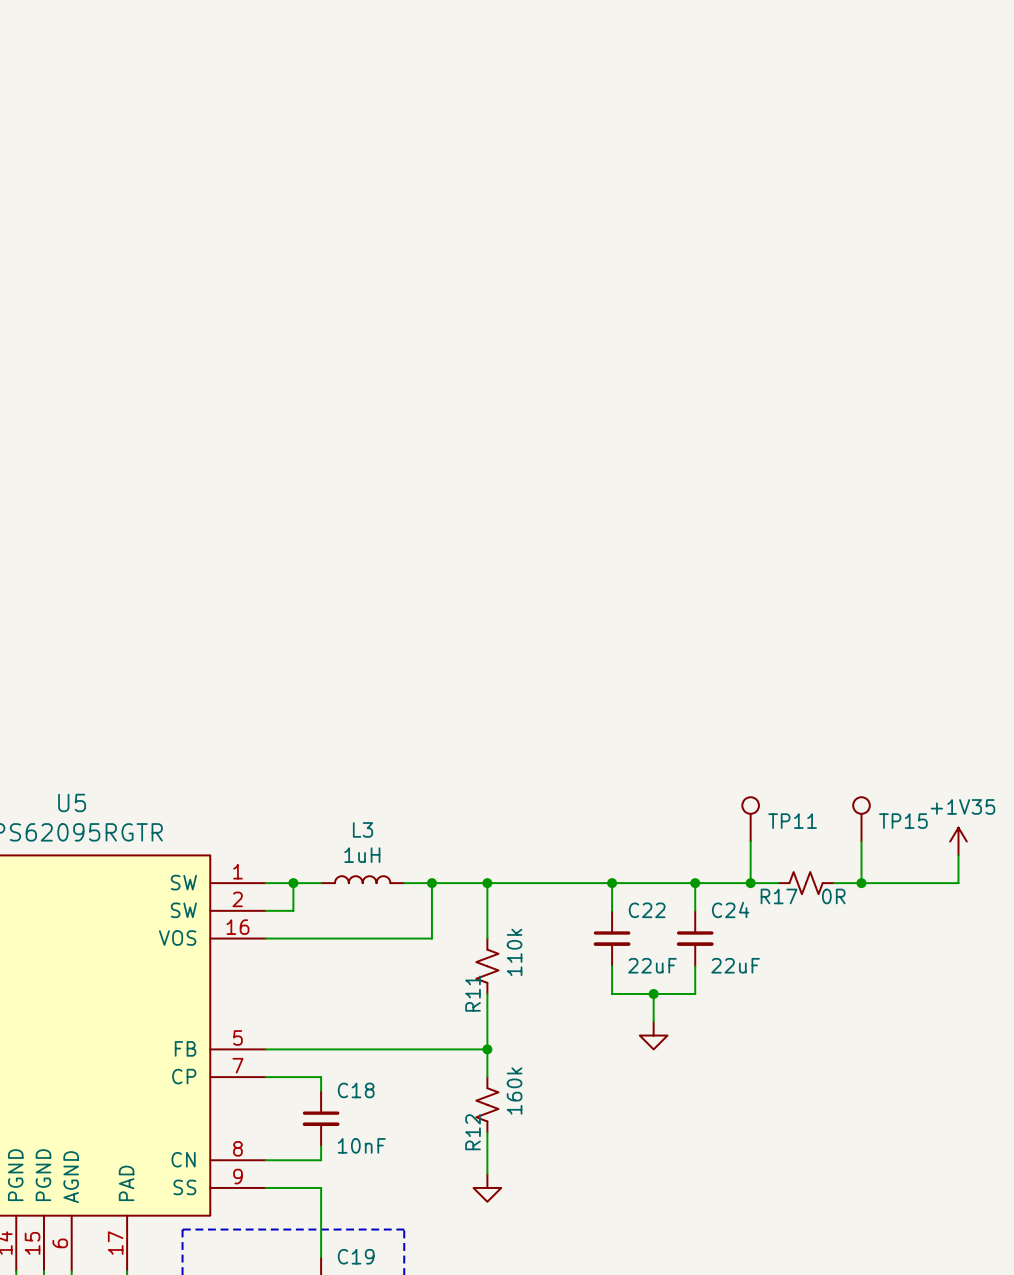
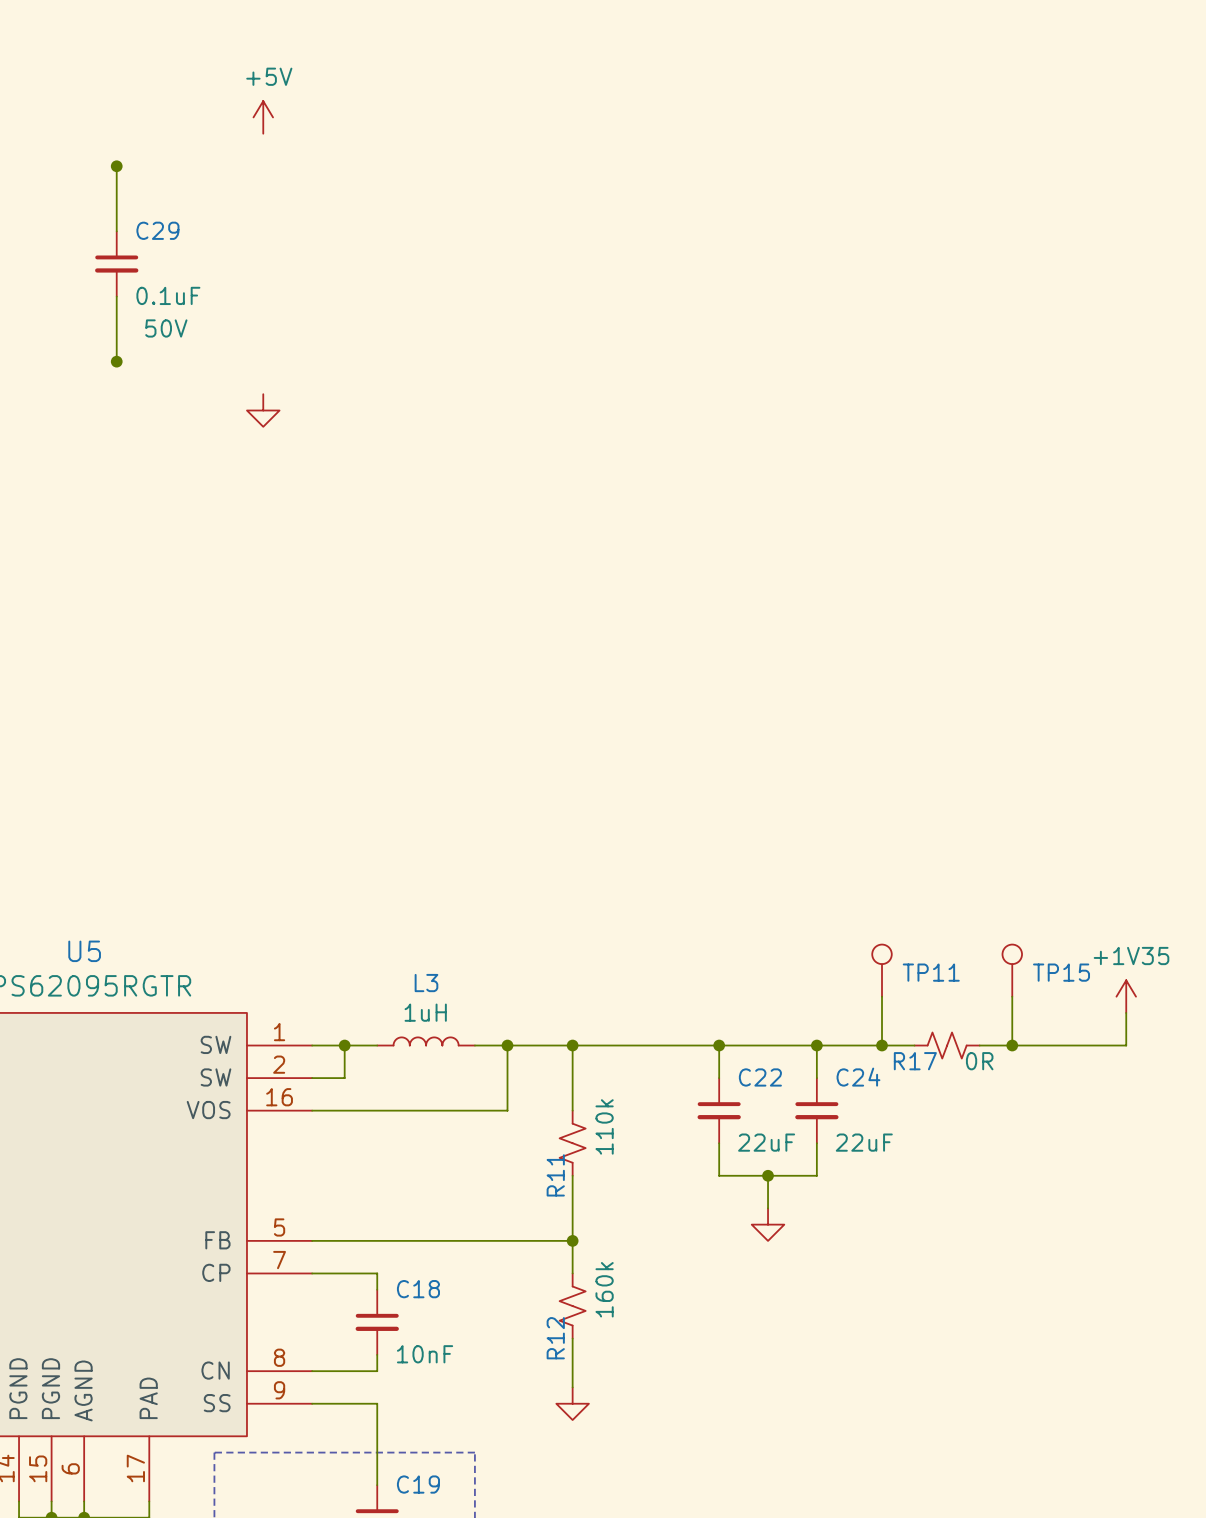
power symbol: none -> +5V (263, 117)
wire: none -> (116, 166) (116, 231)
junction: none -> (116, 166)
C29: none -> 0.1uF (116, 263)
wire: none -> (116, 296) (116, 361)
junction: none -> (116, 361)
power symbol: none -> (263, 410)

